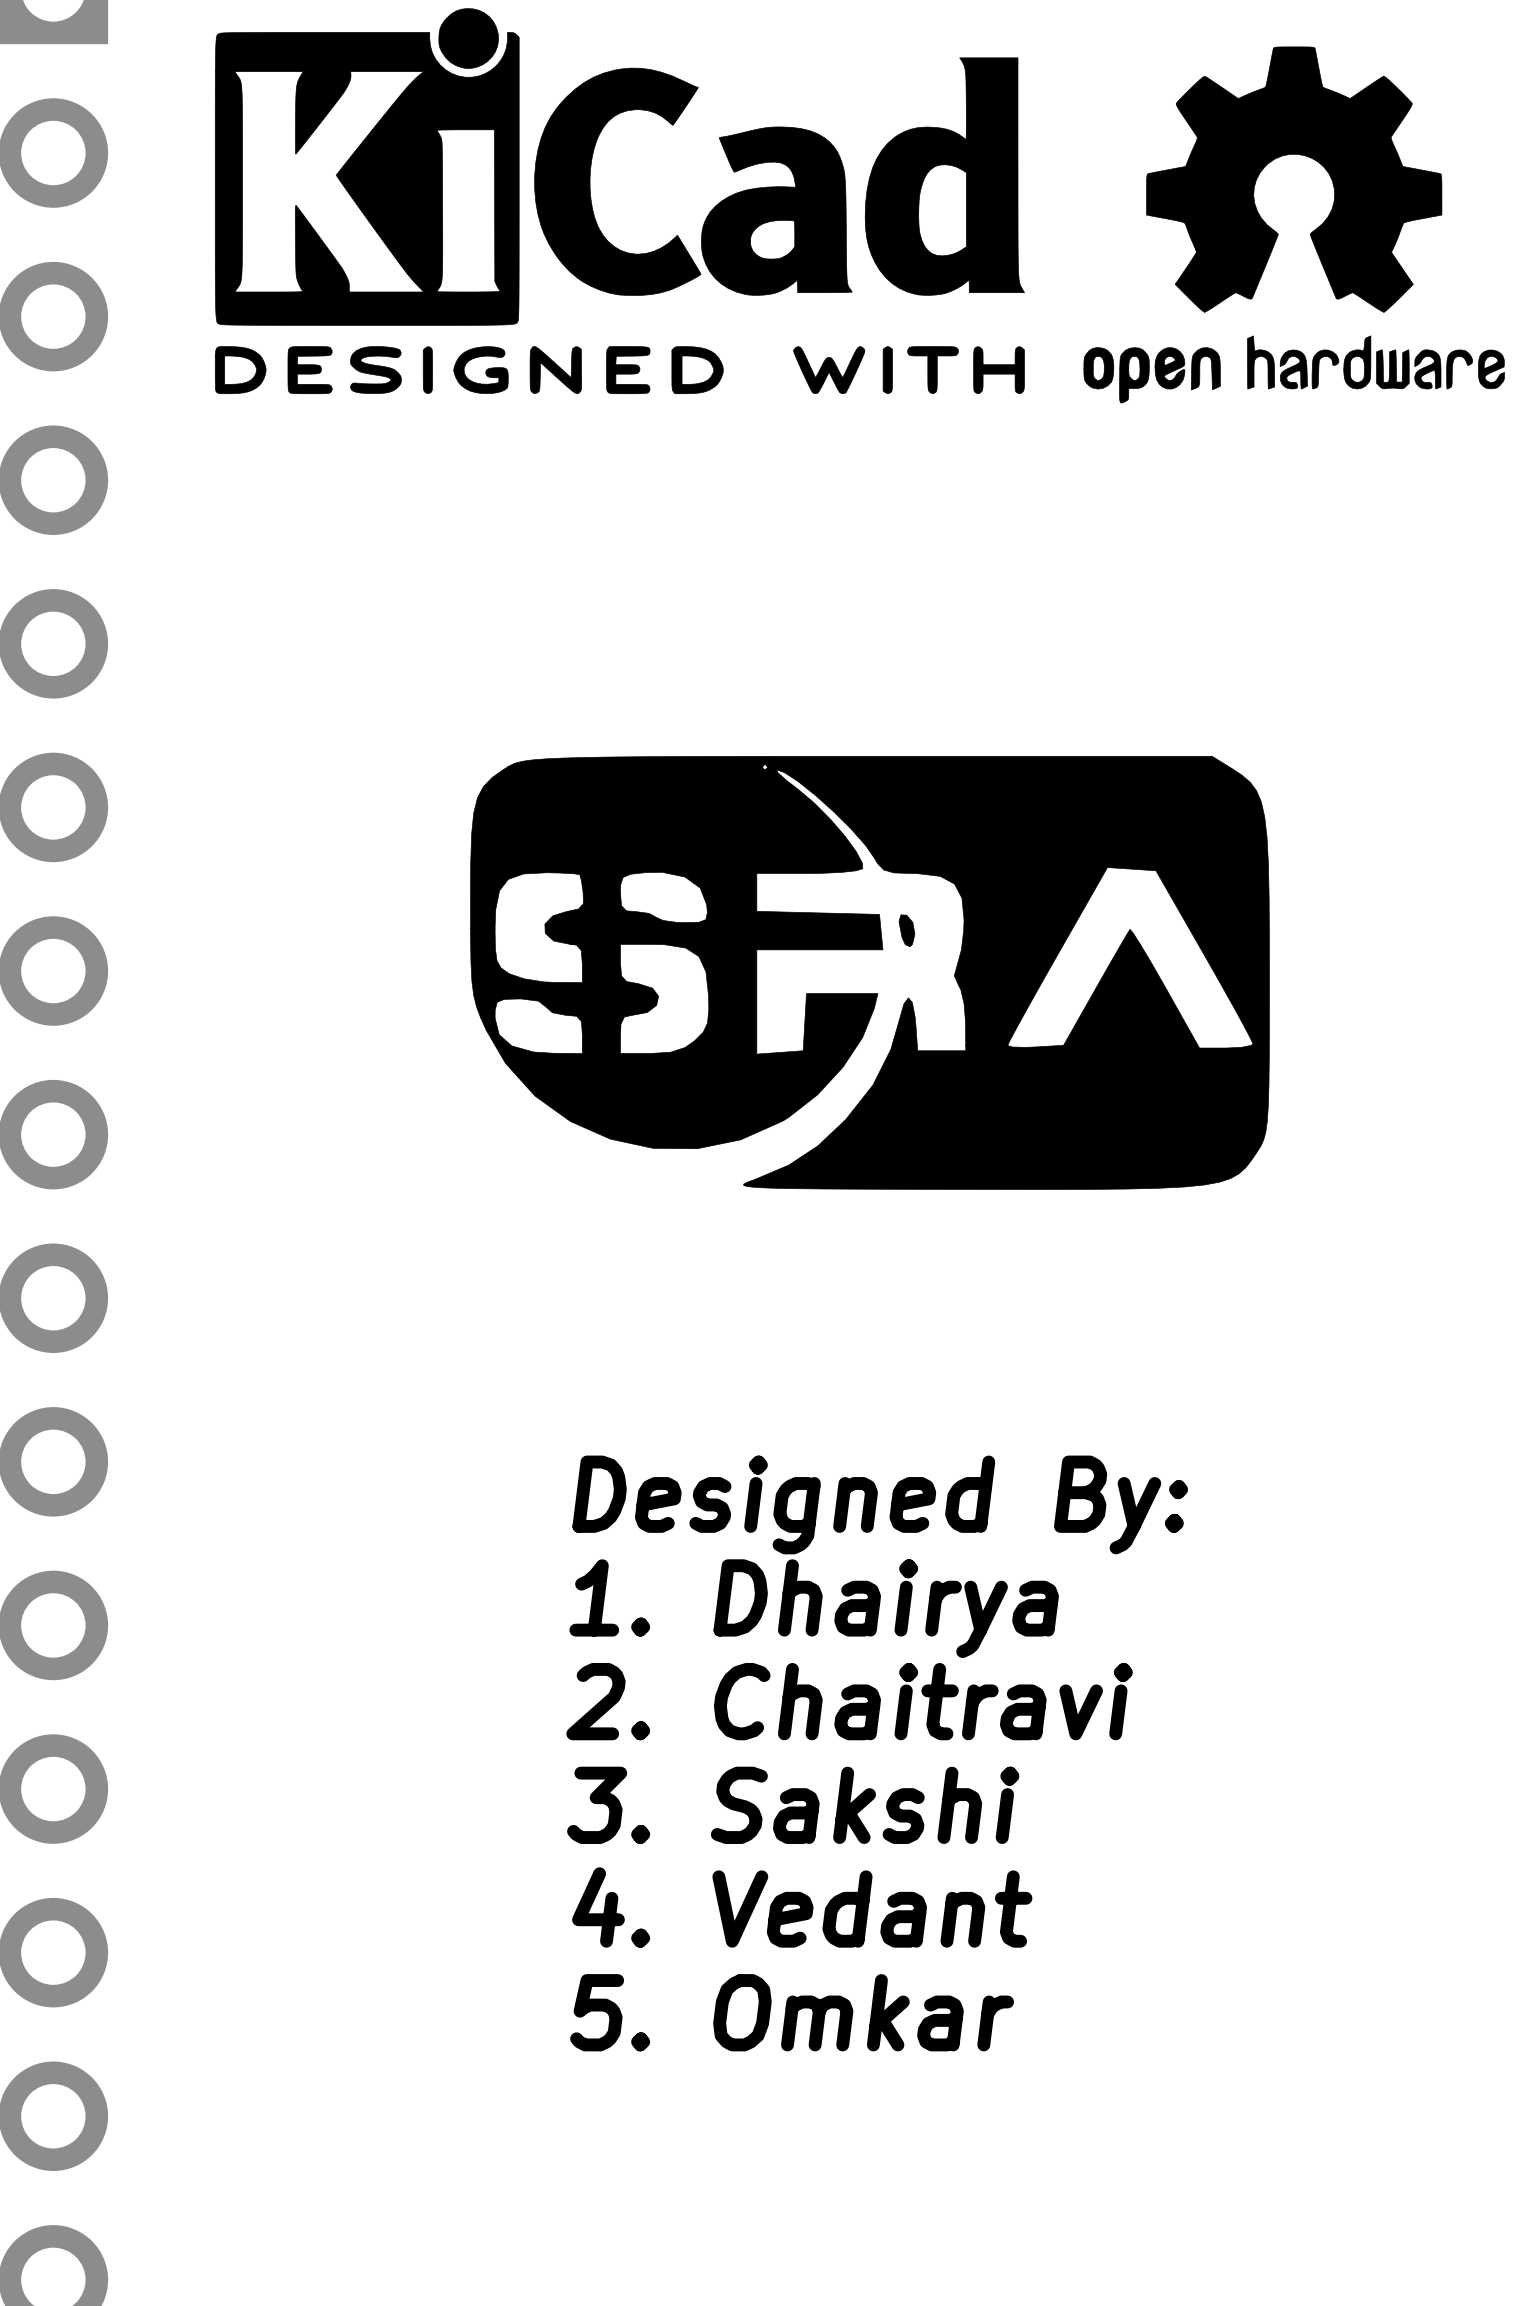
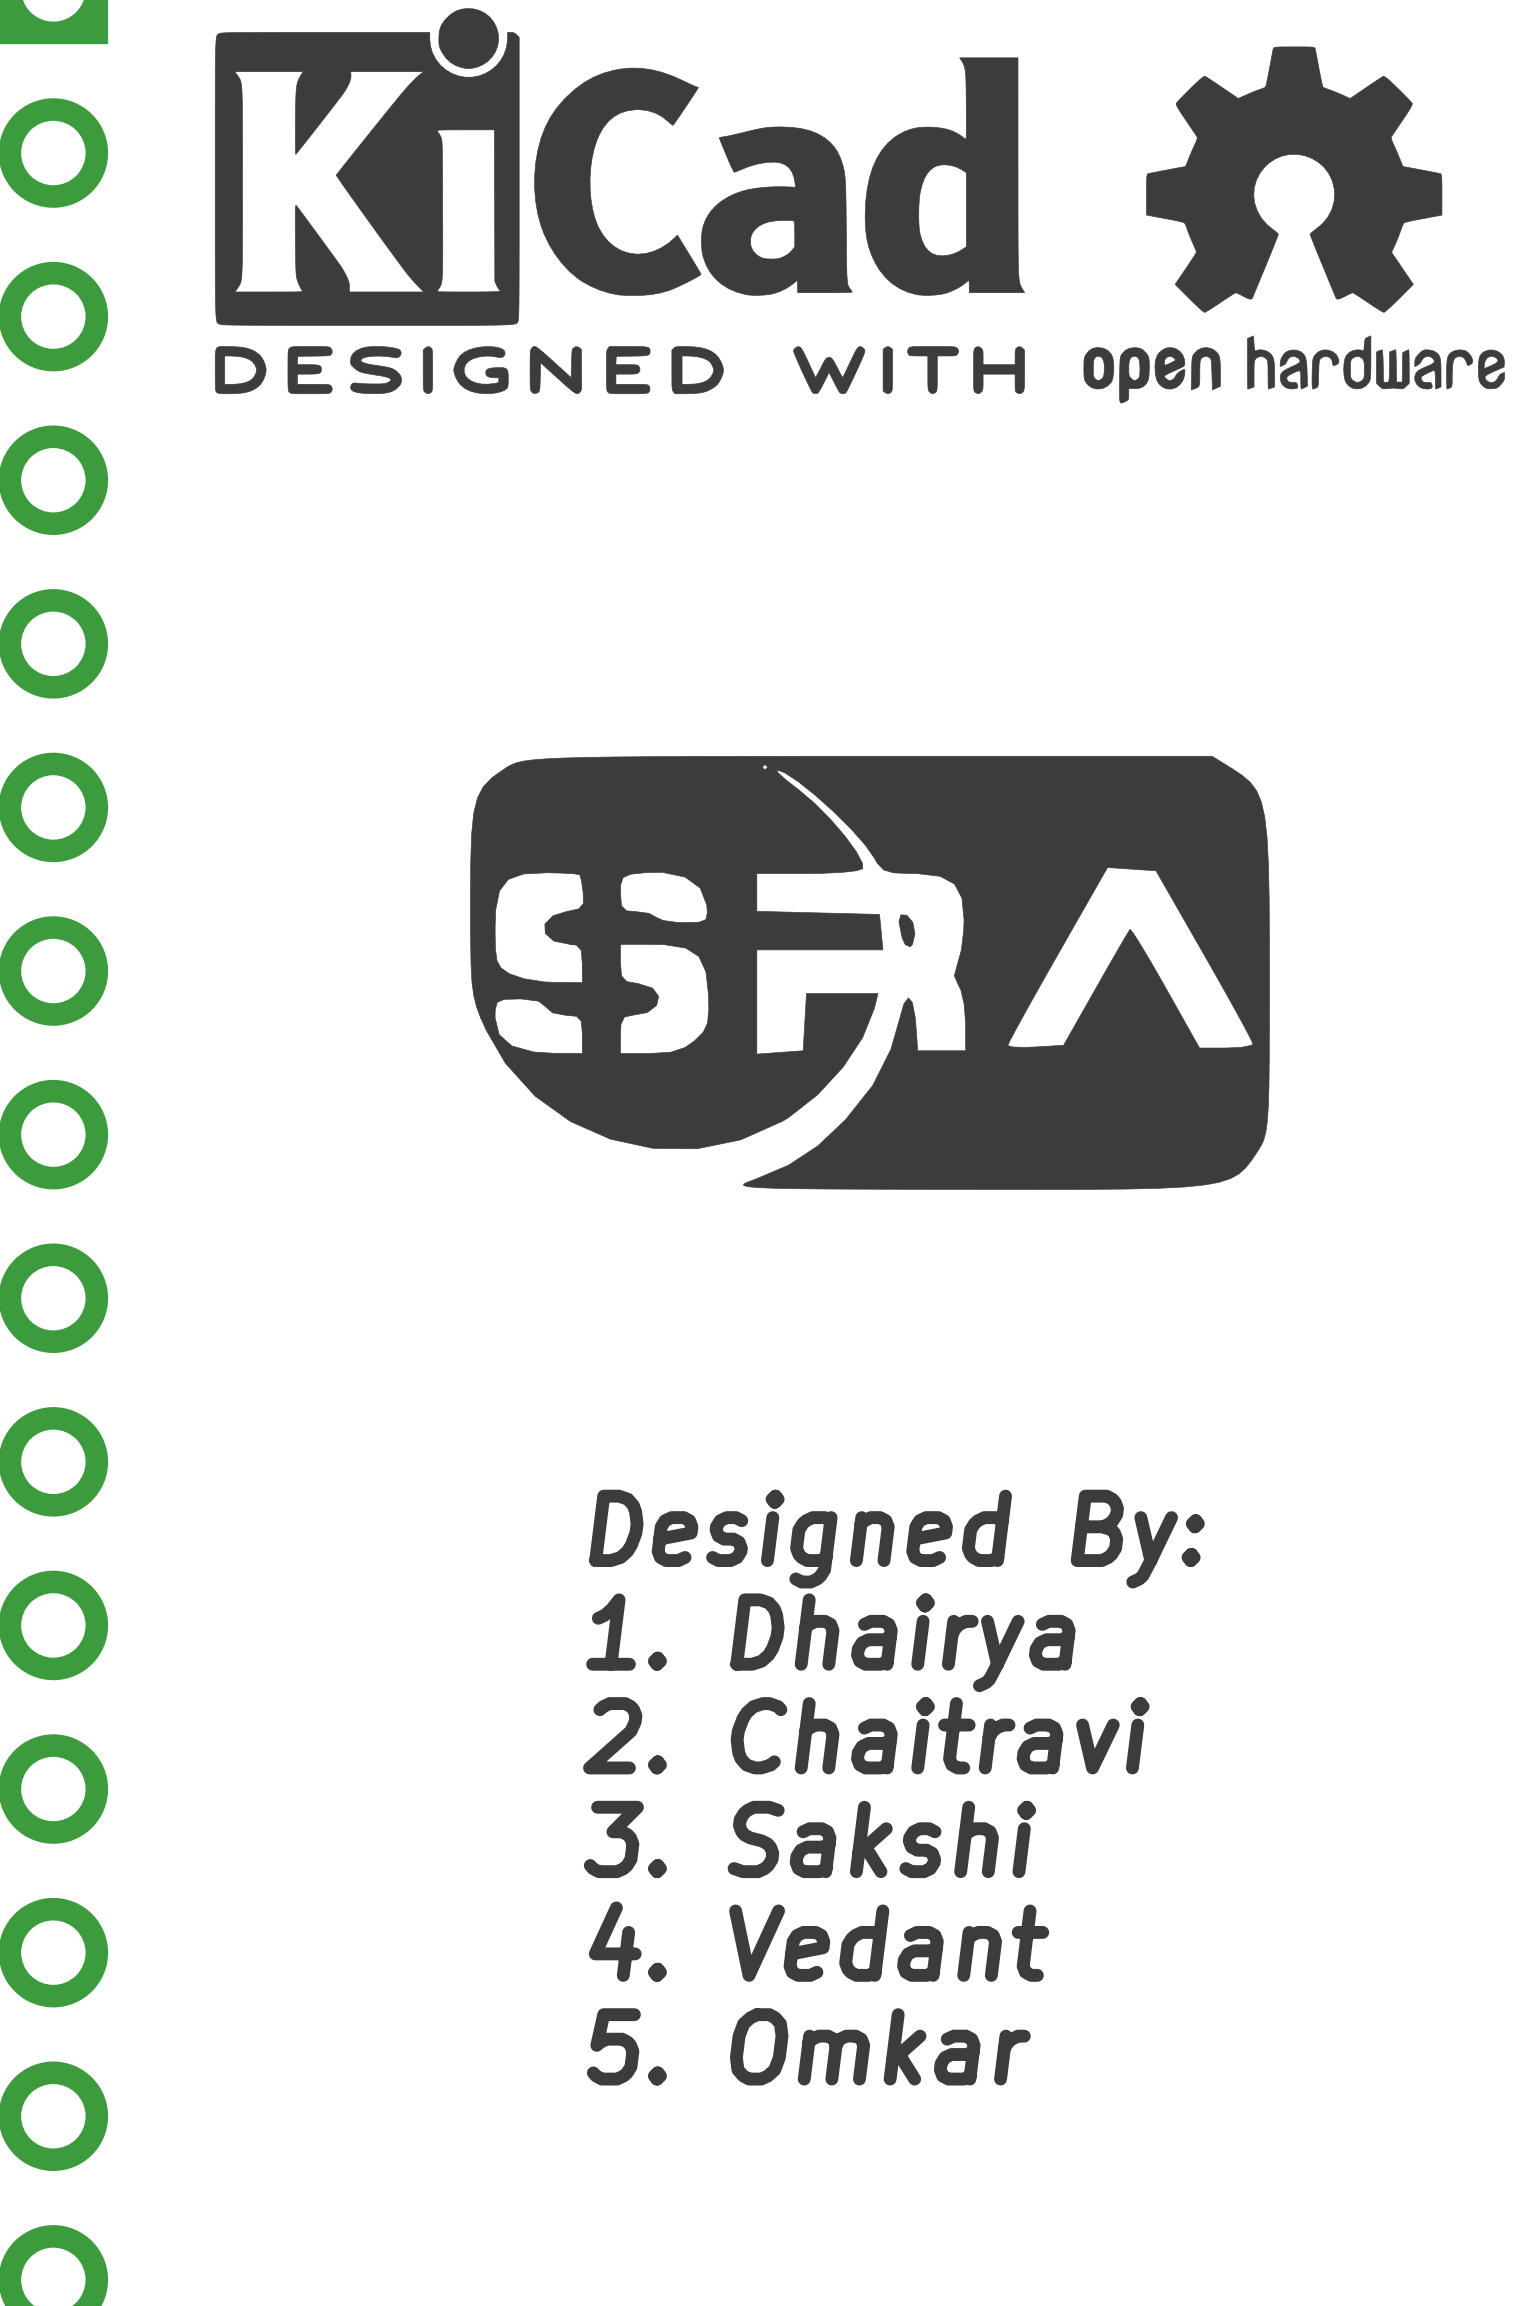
text position: Designed By: (880, 1504) -> Designed By: (897, 1539)
text position: 1. Dhairya (814, 1608) -> 1. Dhairya (830, 1642)
text position: 2. Chaitravi (849, 1701) -> 2. Chaitravi (866, 1735)
text position: 3. Sakshi (793, 1805) -> 3. Sakshi (809, 1839)
text position: 4. Vedant (802, 1907) -> 4. Vedant (819, 1941)
text position: 5. Omkar (792, 2012) -> 5. Omkar (808, 2046)

